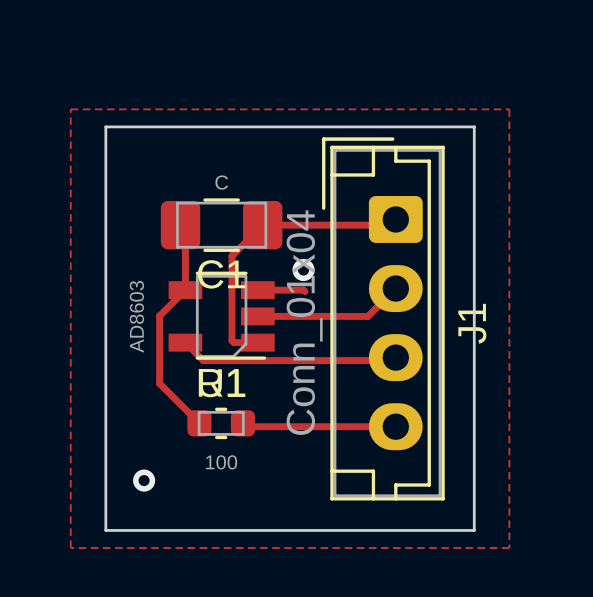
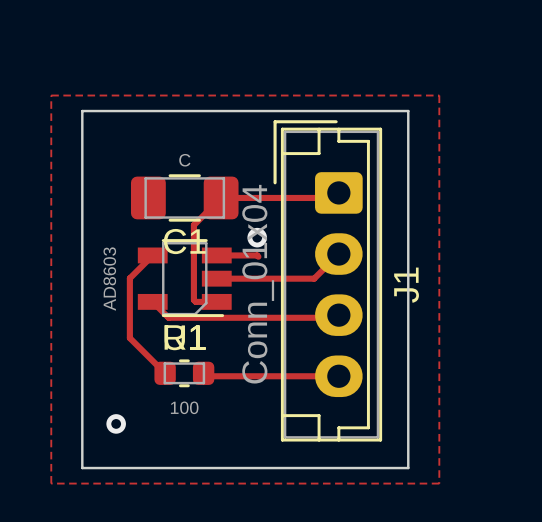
track: (185, 230) (185, 290) -> none

